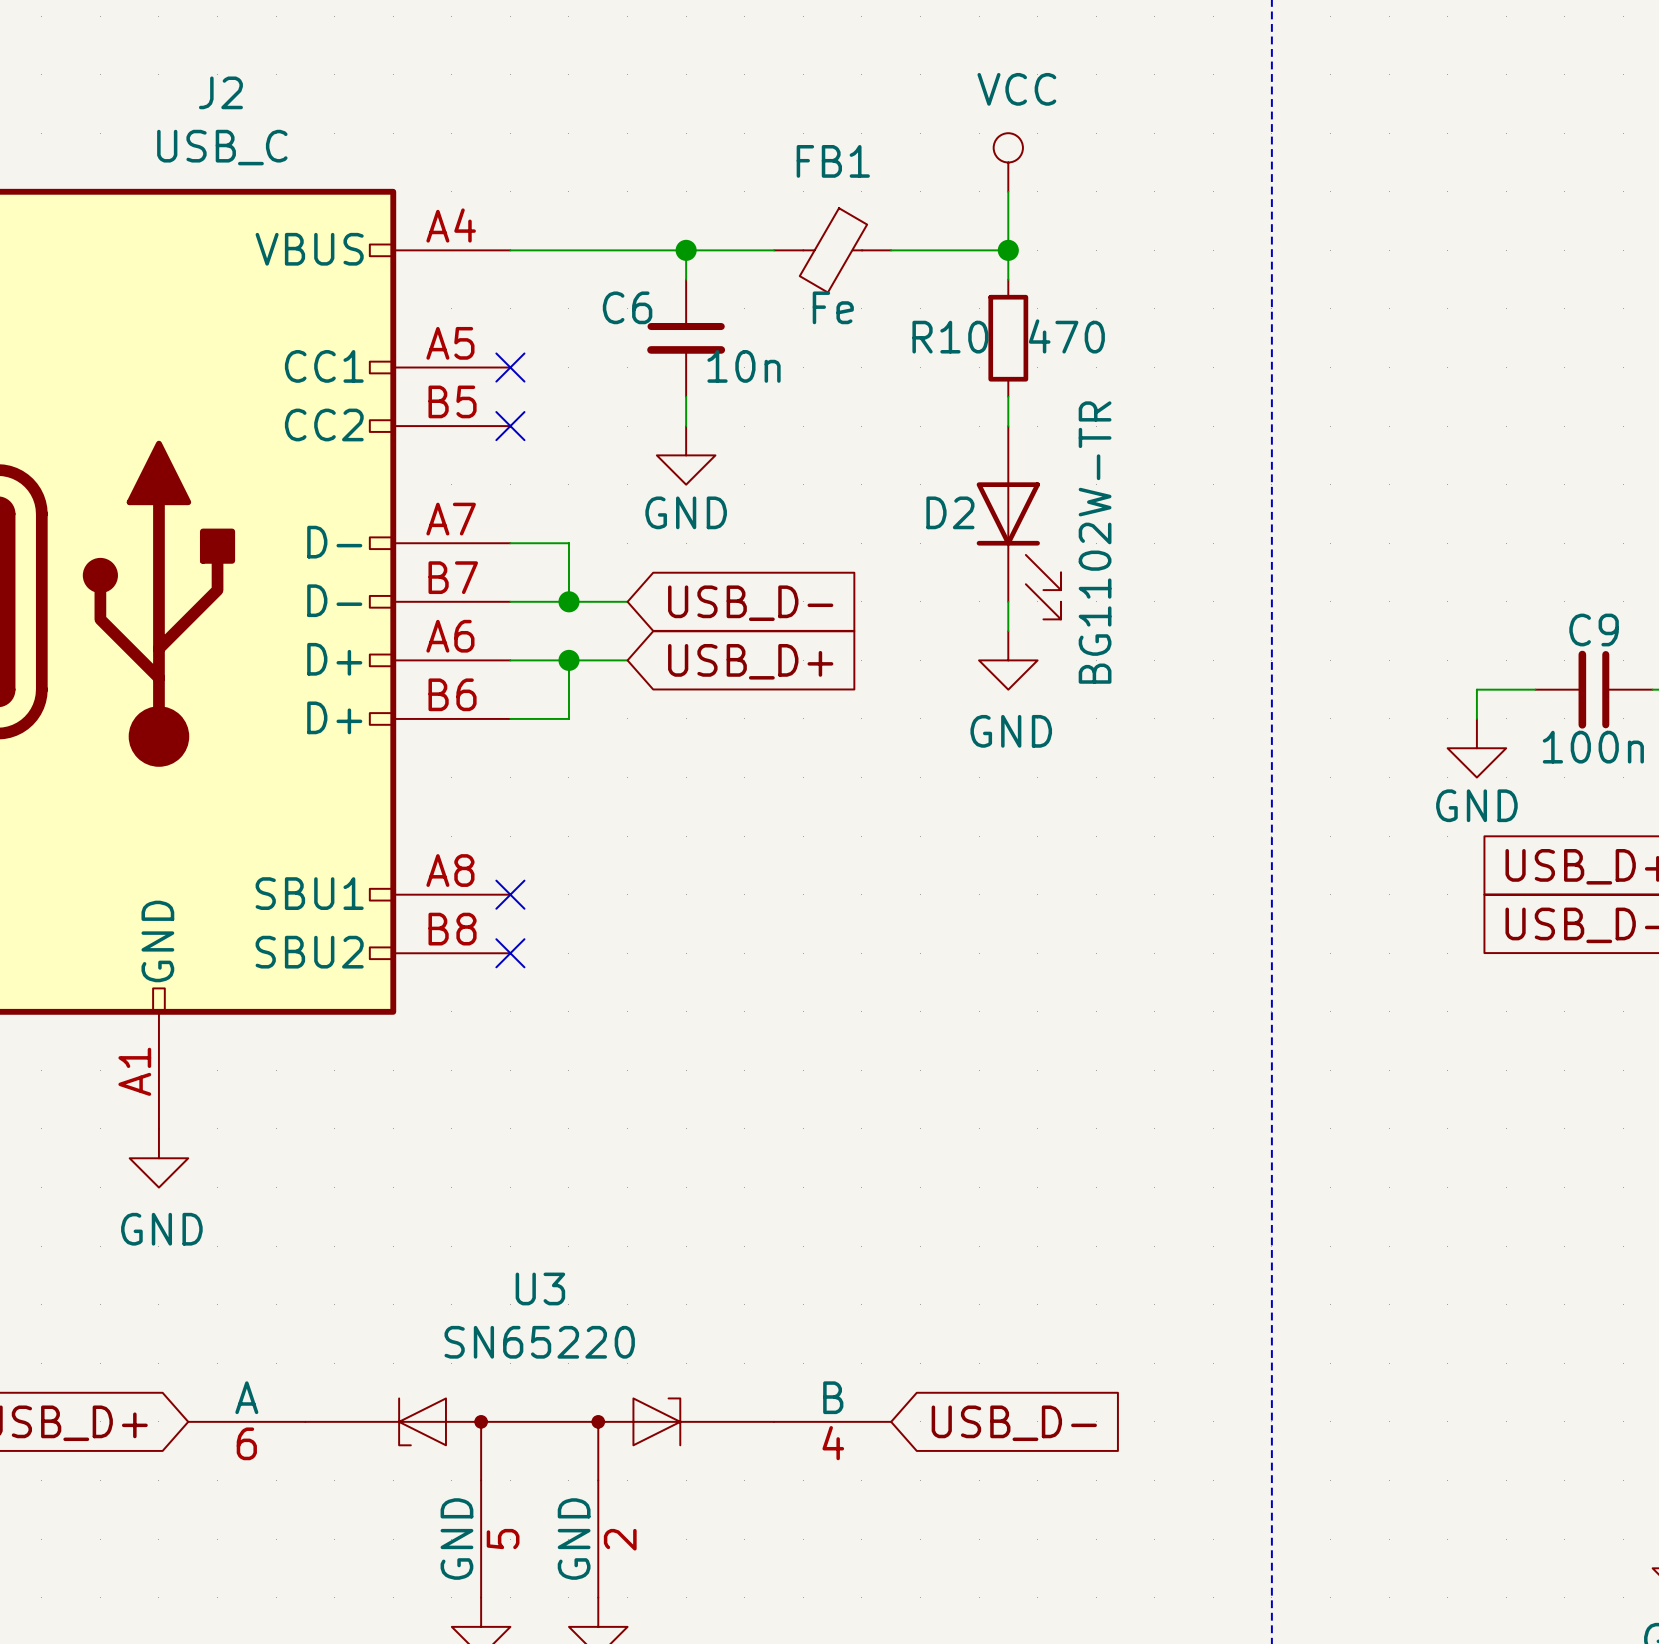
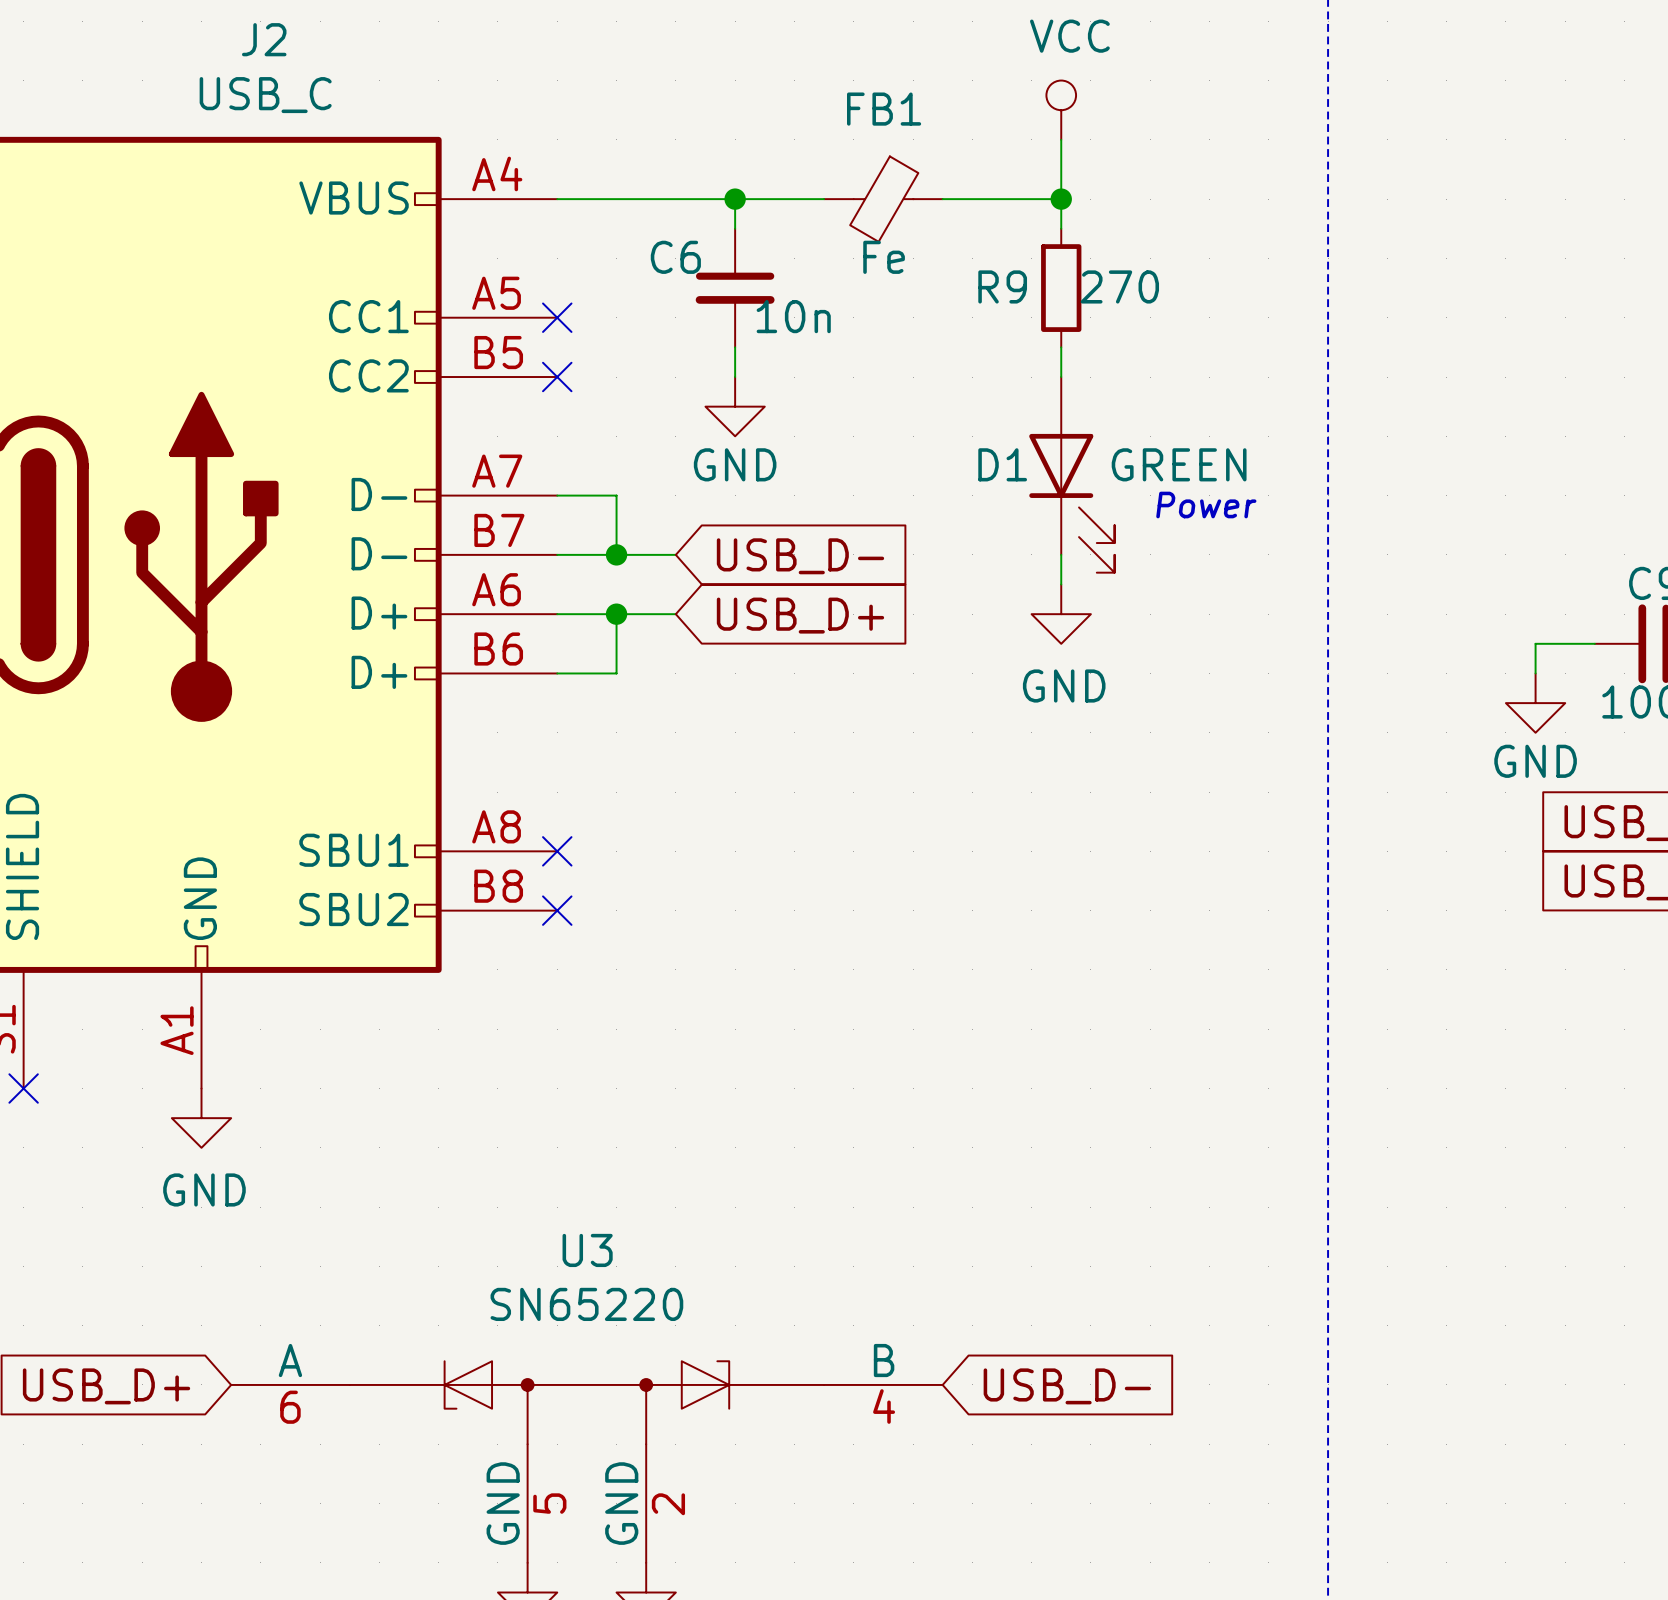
R10 value: 470 (1066, 336) -> 270 (1119, 286)
R10 name: R10 (950, 337) -> R9 (1002, 286)
D2 name: D2 (950, 512) -> D1 (1002, 464)
D2 value: BG1102W-TR (1095, 542) -> GREEN (1179, 464)
text: none -> Power (1206, 505)

